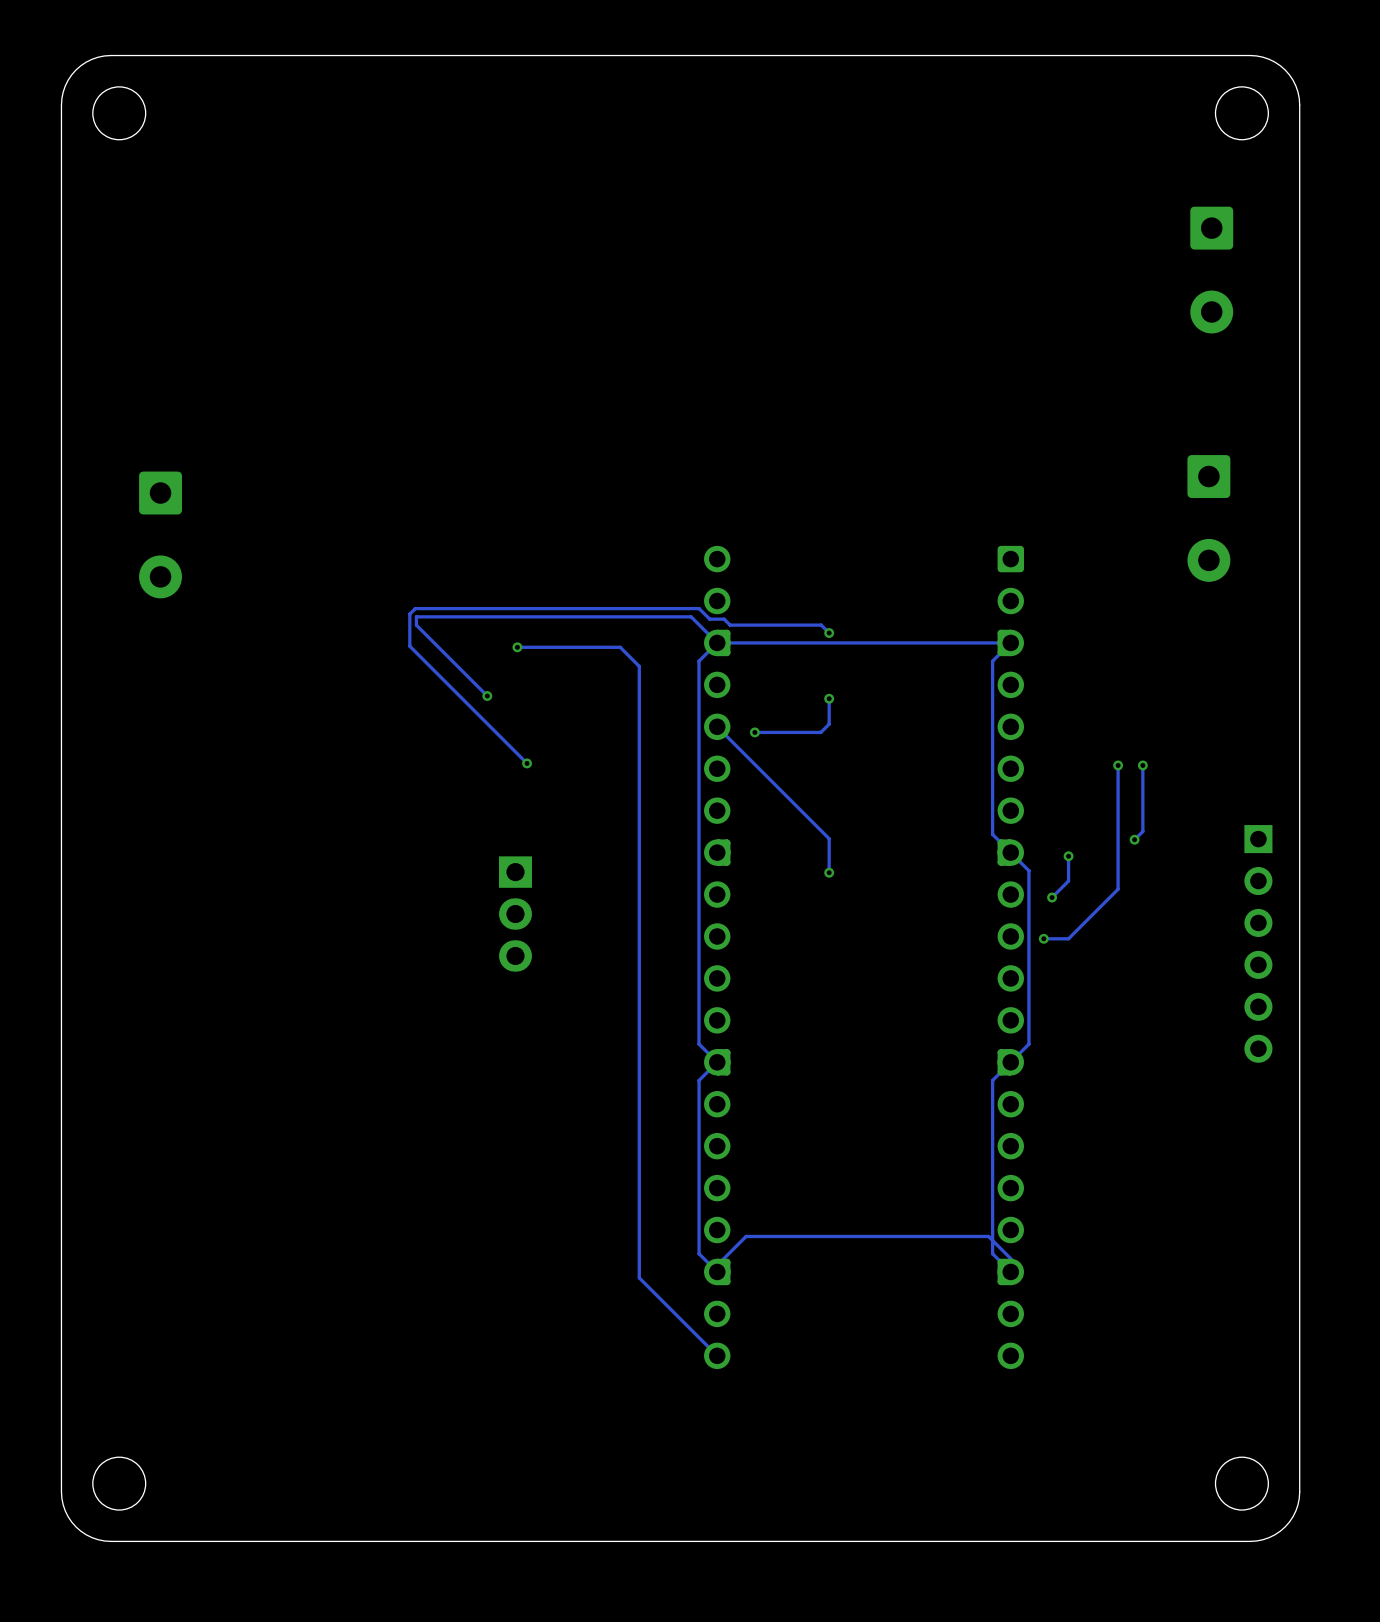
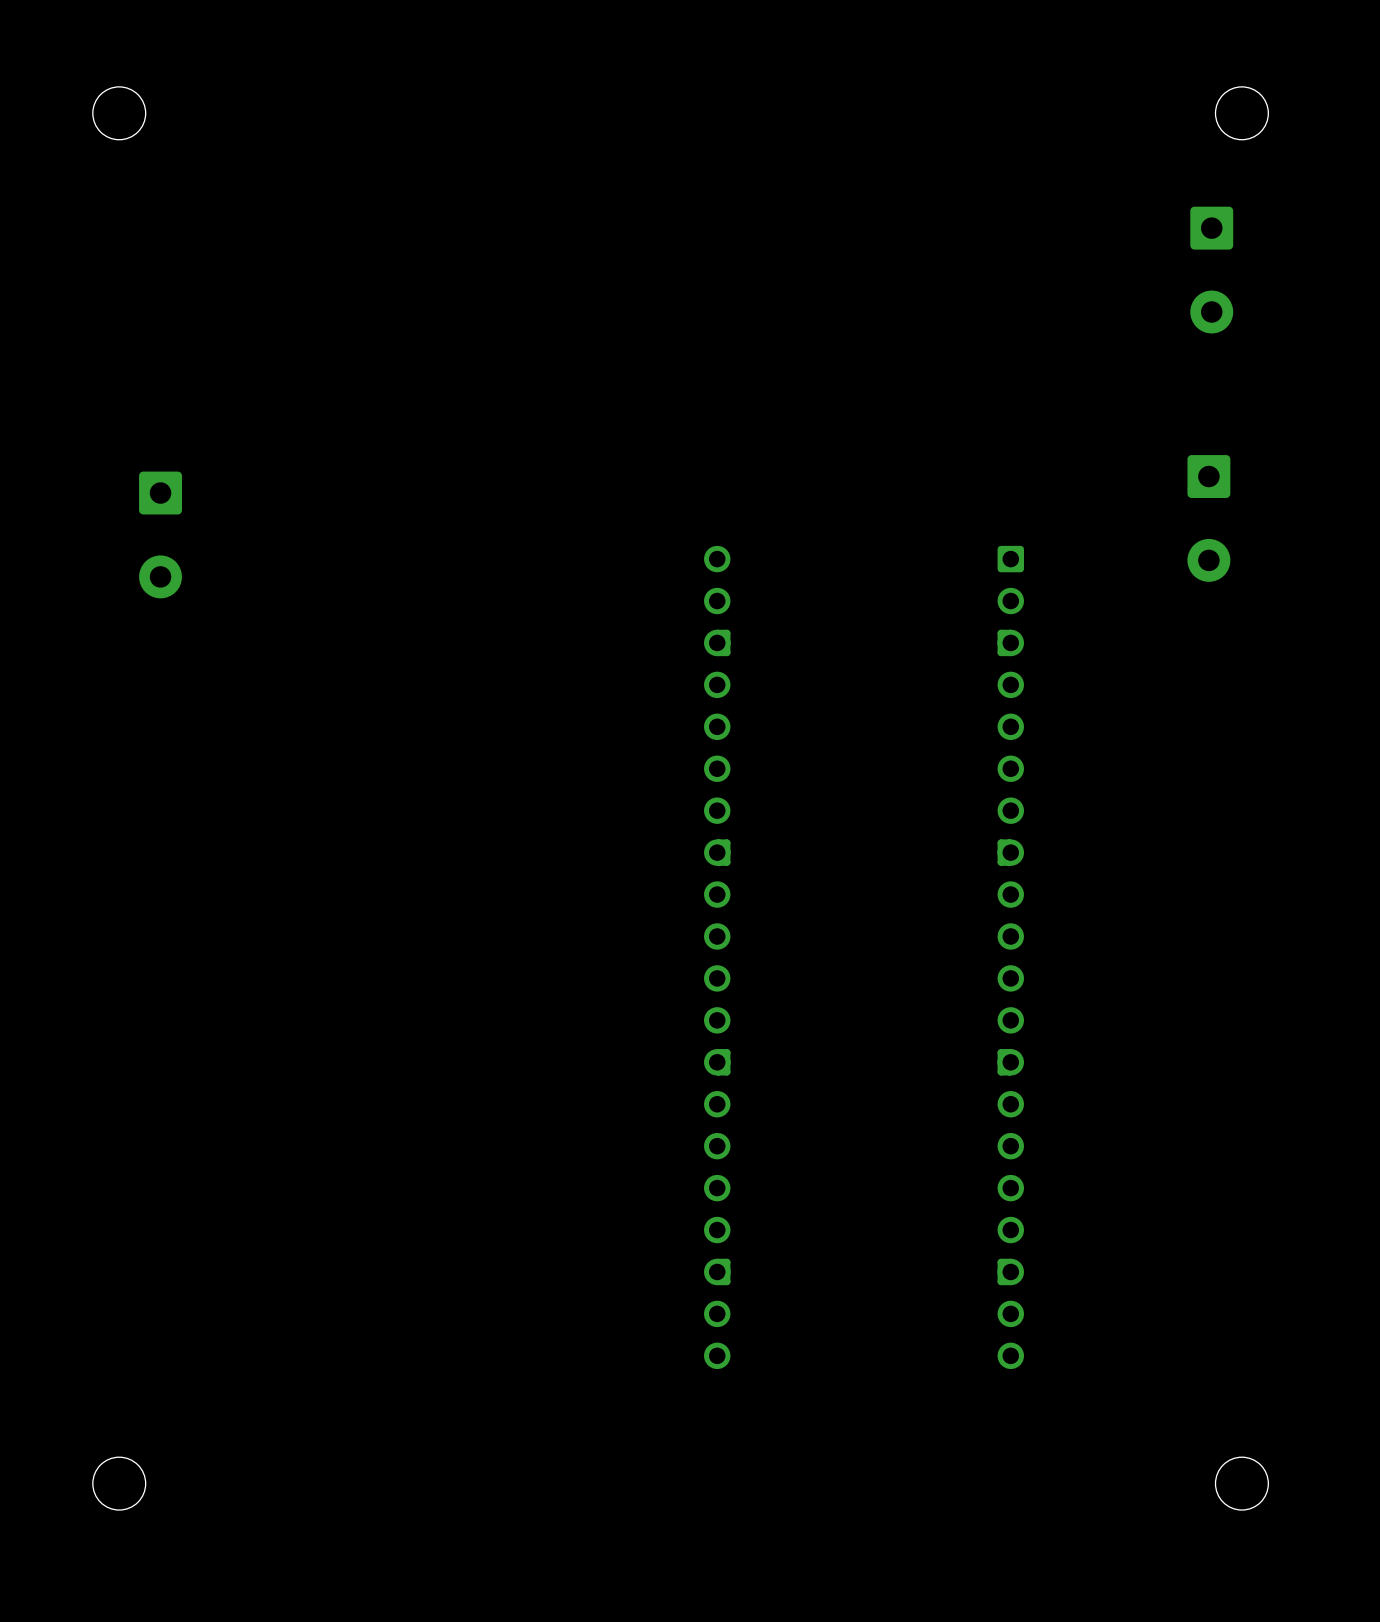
board edge: (1250, 55) (110, 55) (98, 57) (86, 62) (71, 74) (65, 86) (61, 105) (61, 1491) (65, 1510) (71, 1522) (80, 1531) (98, 1539) (110, 1541) (1250, 1541) (1262, 1539) (1274, 1534) (1289, 1522) (1298, 1504) (1299, 1491) (1299, 105) (1295, 86) (1285, 70) (1269, 59) (1250, 55) -> none
track: (829, 633) (821, 625) (730, 625) (724, 619) (709, 619) (699, 608) (415, 608) (409, 614) (409, 646) (527, 763) -> none
via: (829, 633) -> none
track: (717, 642) (691, 616) (416, 616) (416, 625) (487, 696) -> none
track: (717, 642) (1010, 642) (992, 661) (992, 834) (1028, 870) (1028, 1044) (992, 1080) (992, 1253) (1010, 1271) (1010, 1258) (988, 1236) (746, 1236) (717, 1265) (717, 1271) (699, 1253) (699, 1080) (717, 1062) (698, 1044) (698, 661) (717, 642) -> none
track: (517, 647) (620, 647) (639, 666) (639, 1277) (717, 1355) -> none
via: (517, 647) -> none
via: (487, 696) -> none
track: (829, 698) (829, 724) (820, 732) (754, 732) -> none
via: (829, 698) -> none
track: (717, 726) (829, 838) (829, 872) -> none
via: (754, 732) -> none
via: (527, 763) -> none
track: (1118, 765) (1118, 889) (1068, 938) (1043, 938) -> none
via: (1118, 765) -> none
track: (1142, 765) (1142, 831) (1134, 839) -> none
via: (1142, 765) -> none
via: (1134, 839) -> none
track: (1068, 856) (1068, 881) (1052, 897) -> none
via: (1068, 856) -> none
via: (829, 872) -> none
via: (1052, 897) -> none
part: (515, 914) -> none
via: (1043, 938) -> none
part: (1258, 943) -> none

